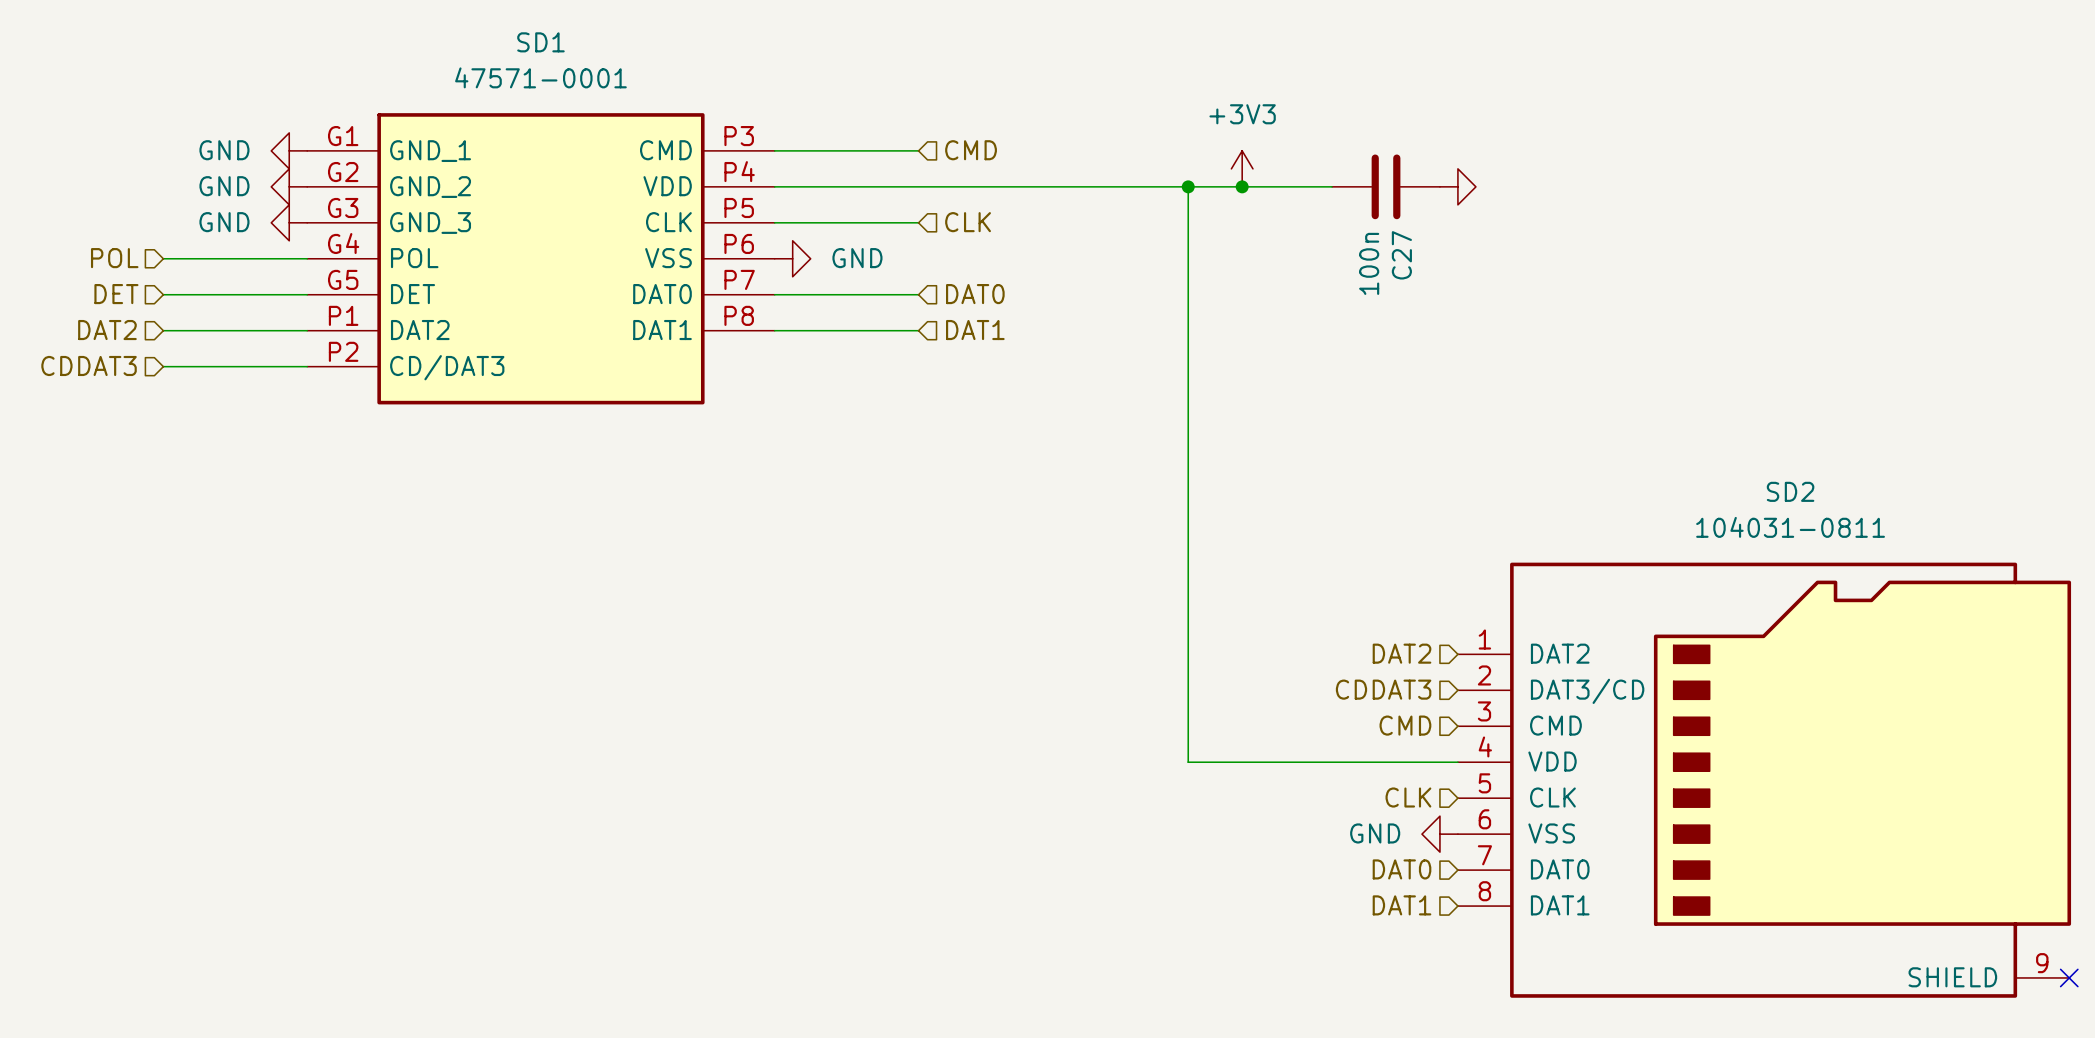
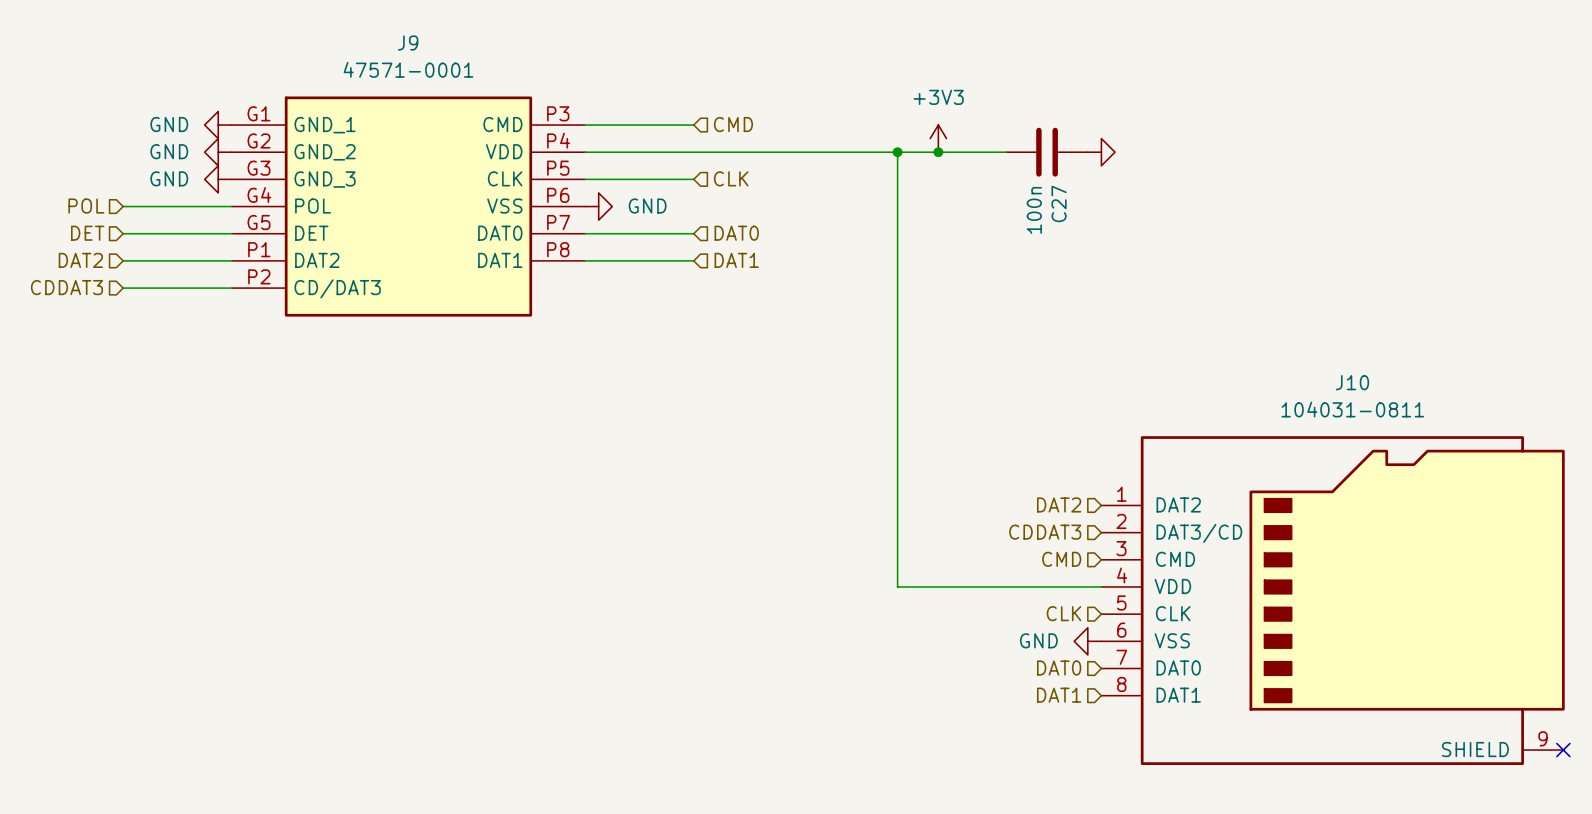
SD1 name: SD1 (540, 42) -> J9 (408, 42)
SD2 name: SD2 (1790, 491) -> J10 (1352, 382)

